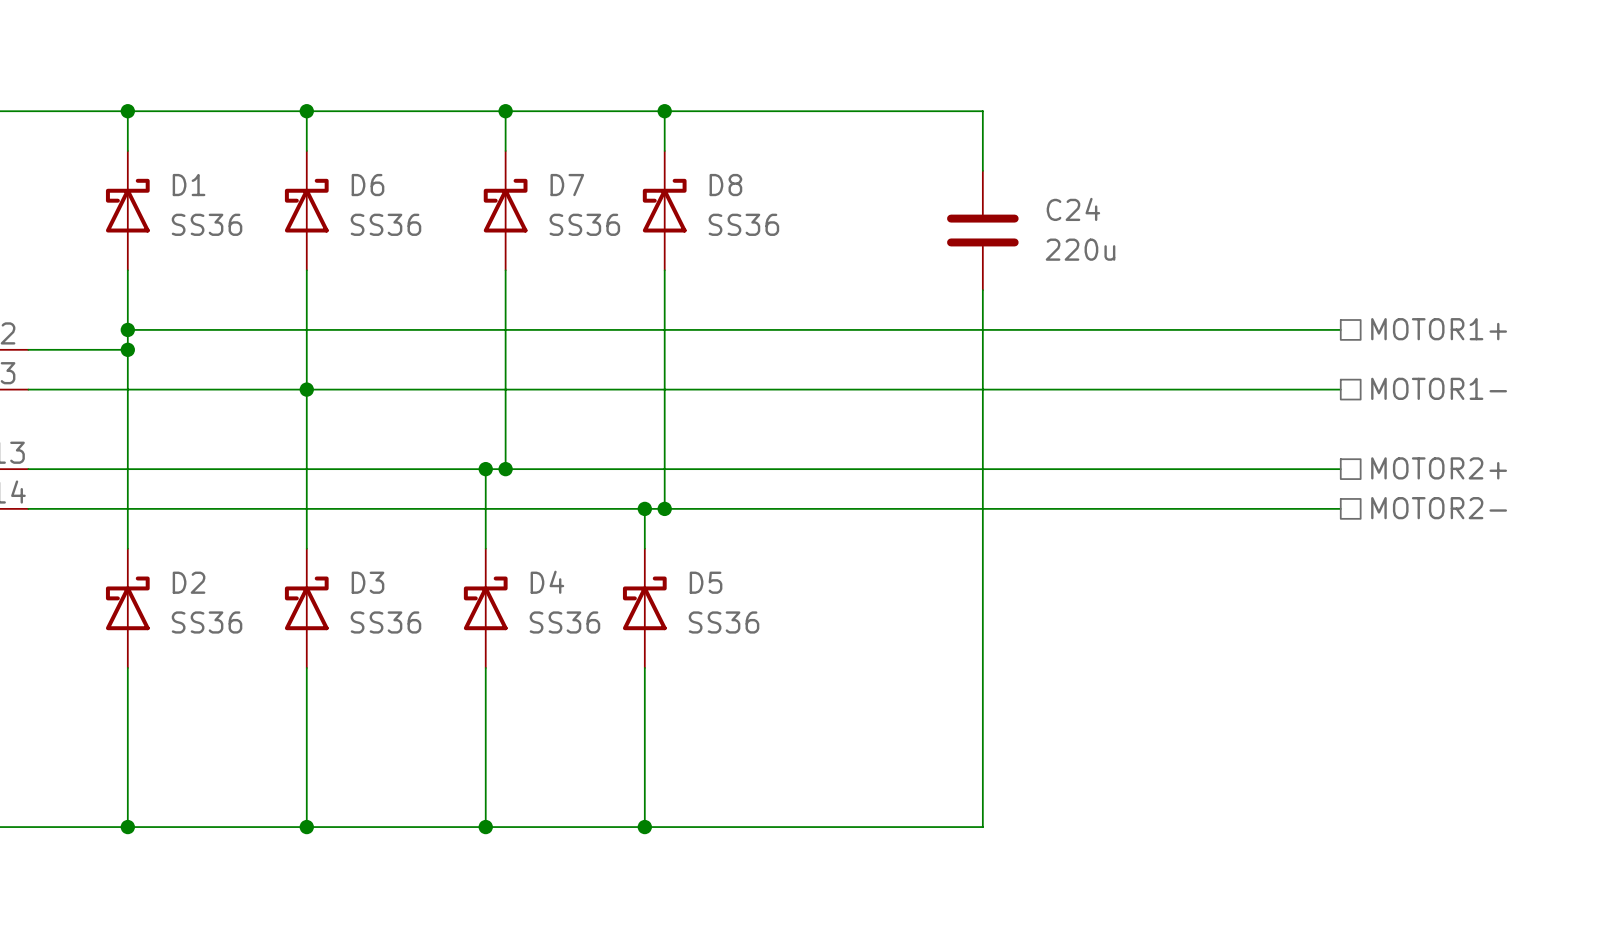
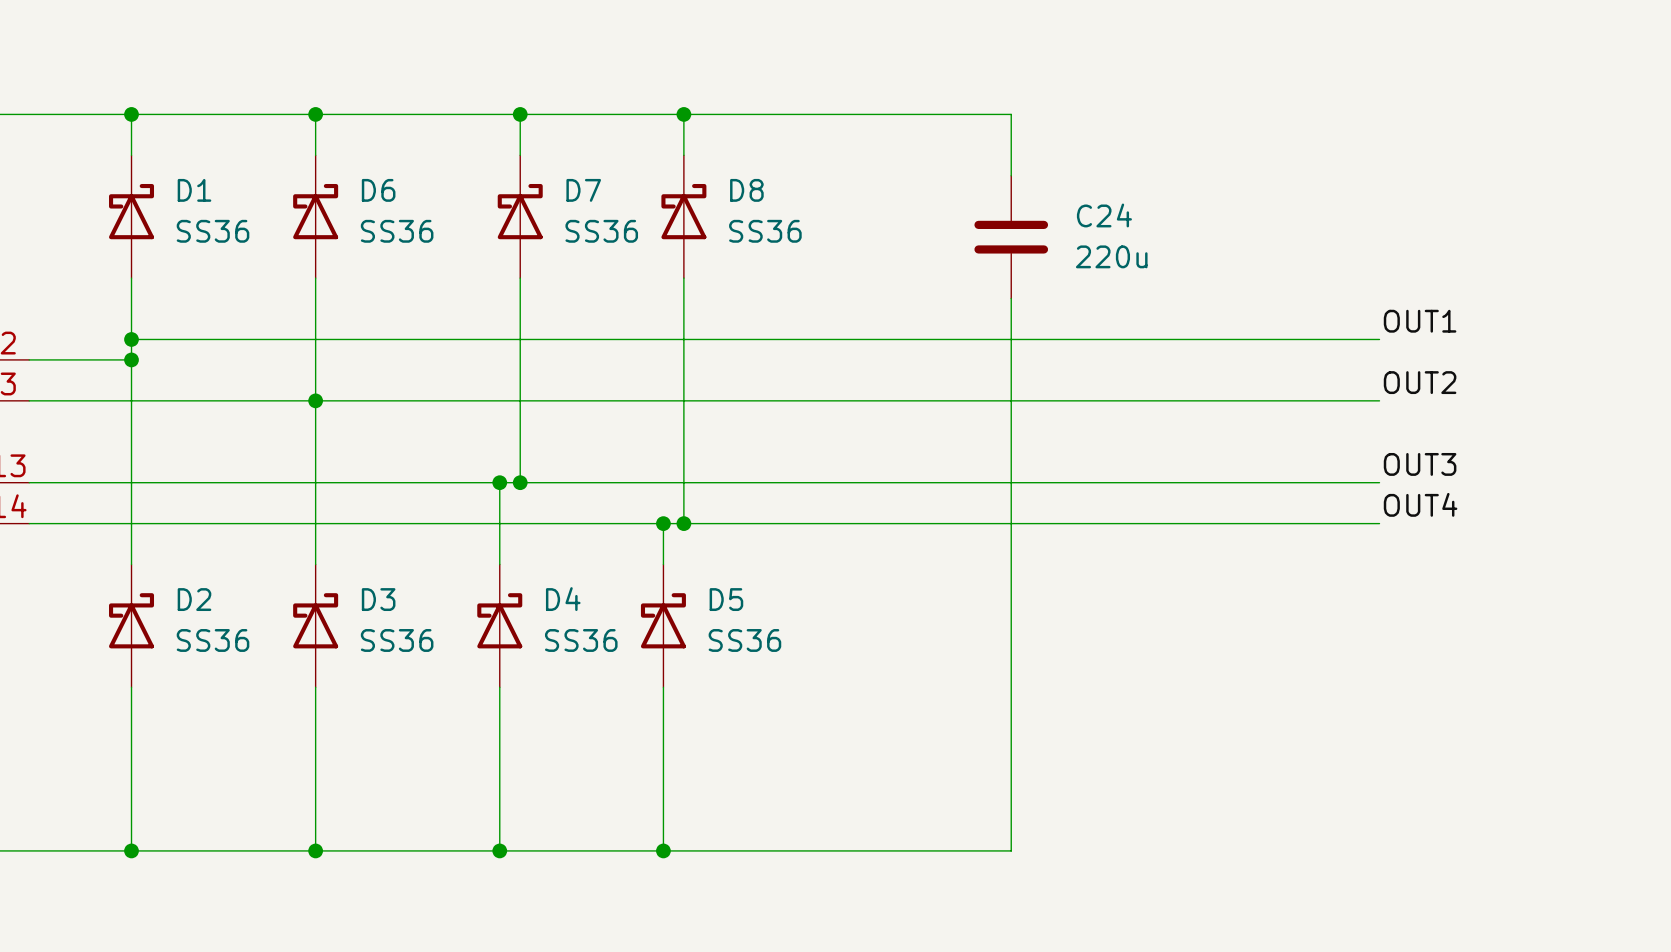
label: none -> OUT1 (1420, 321)
hierarchical label: MOTOR1+ (1439, 329) -> none
label: none -> OUT2 (1420, 382)
hierarchical label: MOTOR1- (1439, 388) -> none
label: none -> OUT3 (1420, 464)
hierarchical label: MOTOR2+ (1439, 468) -> none
label: none -> OUT4 (1420, 504)
hierarchical label: MOTOR2- (1439, 508) -> none

